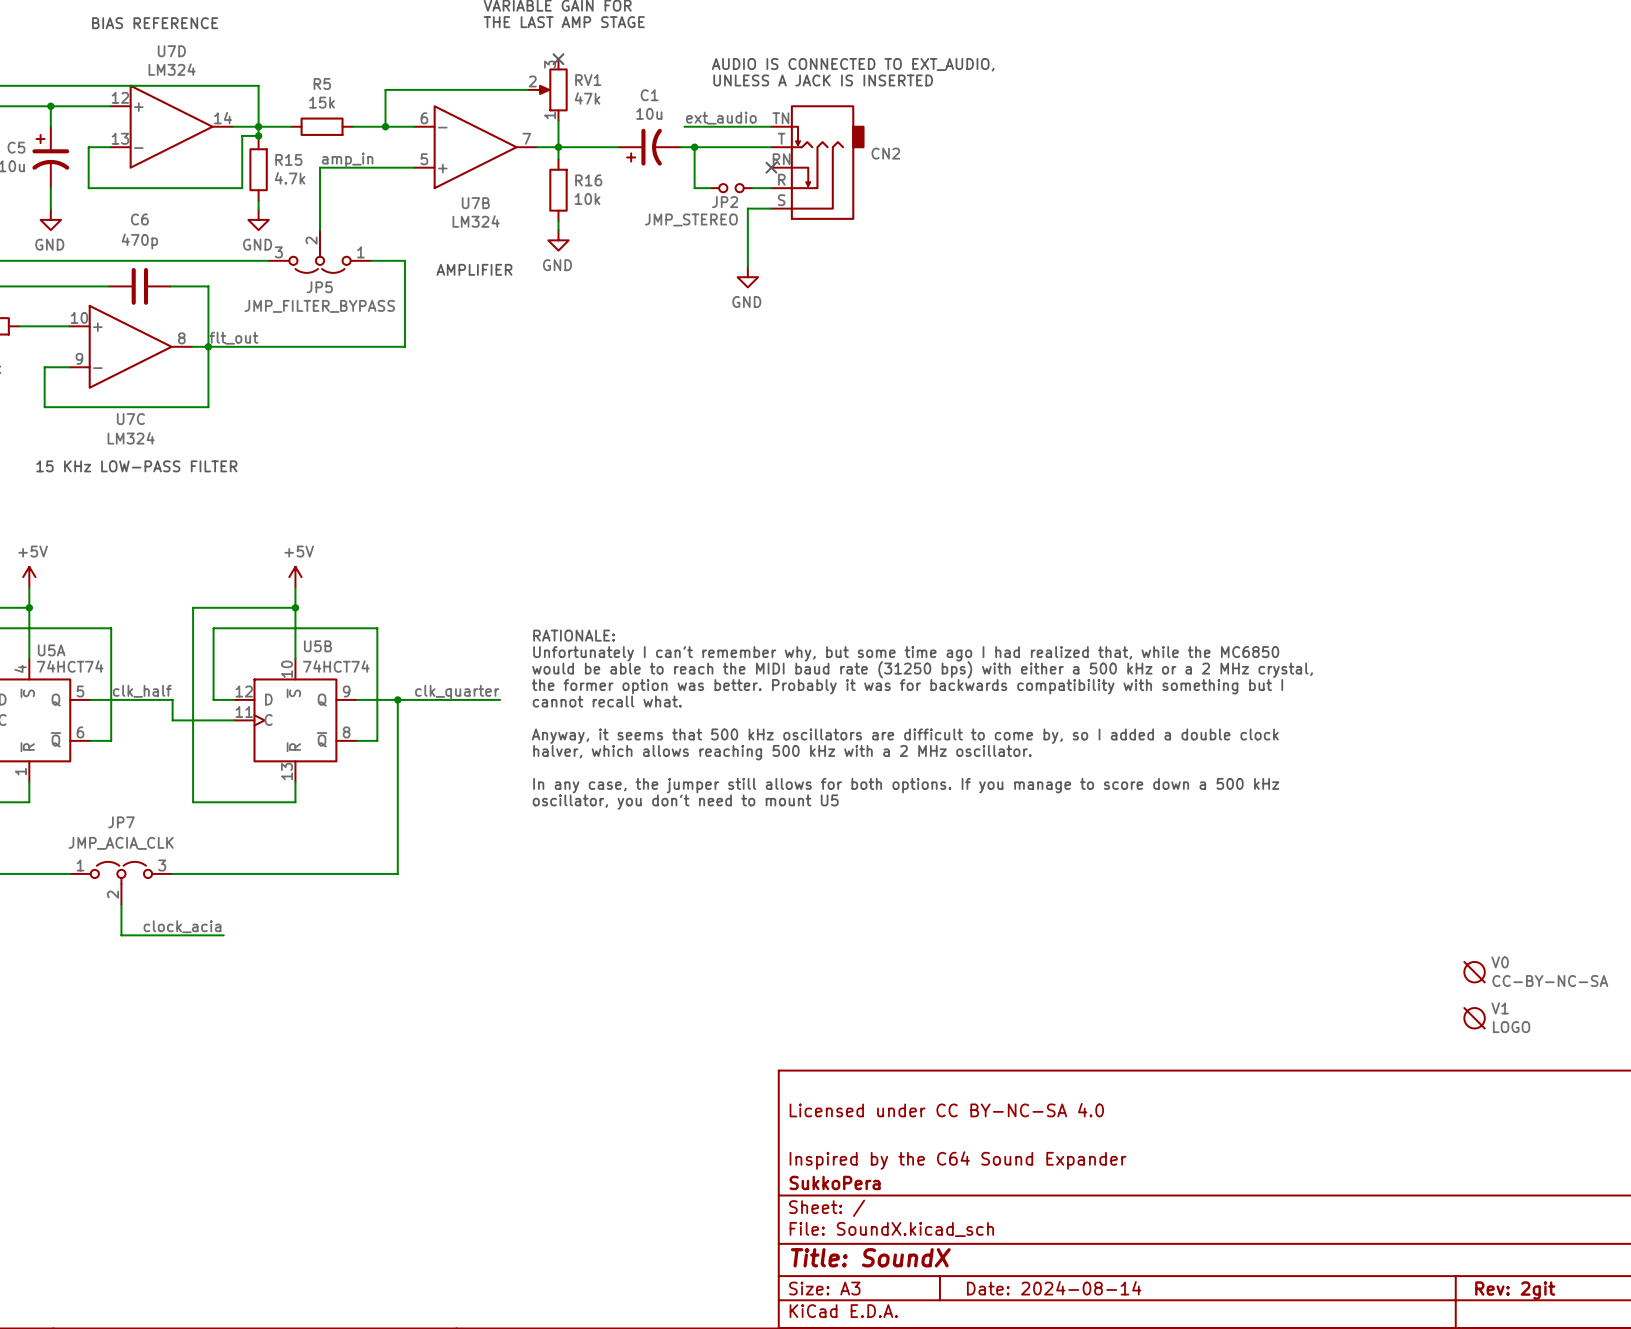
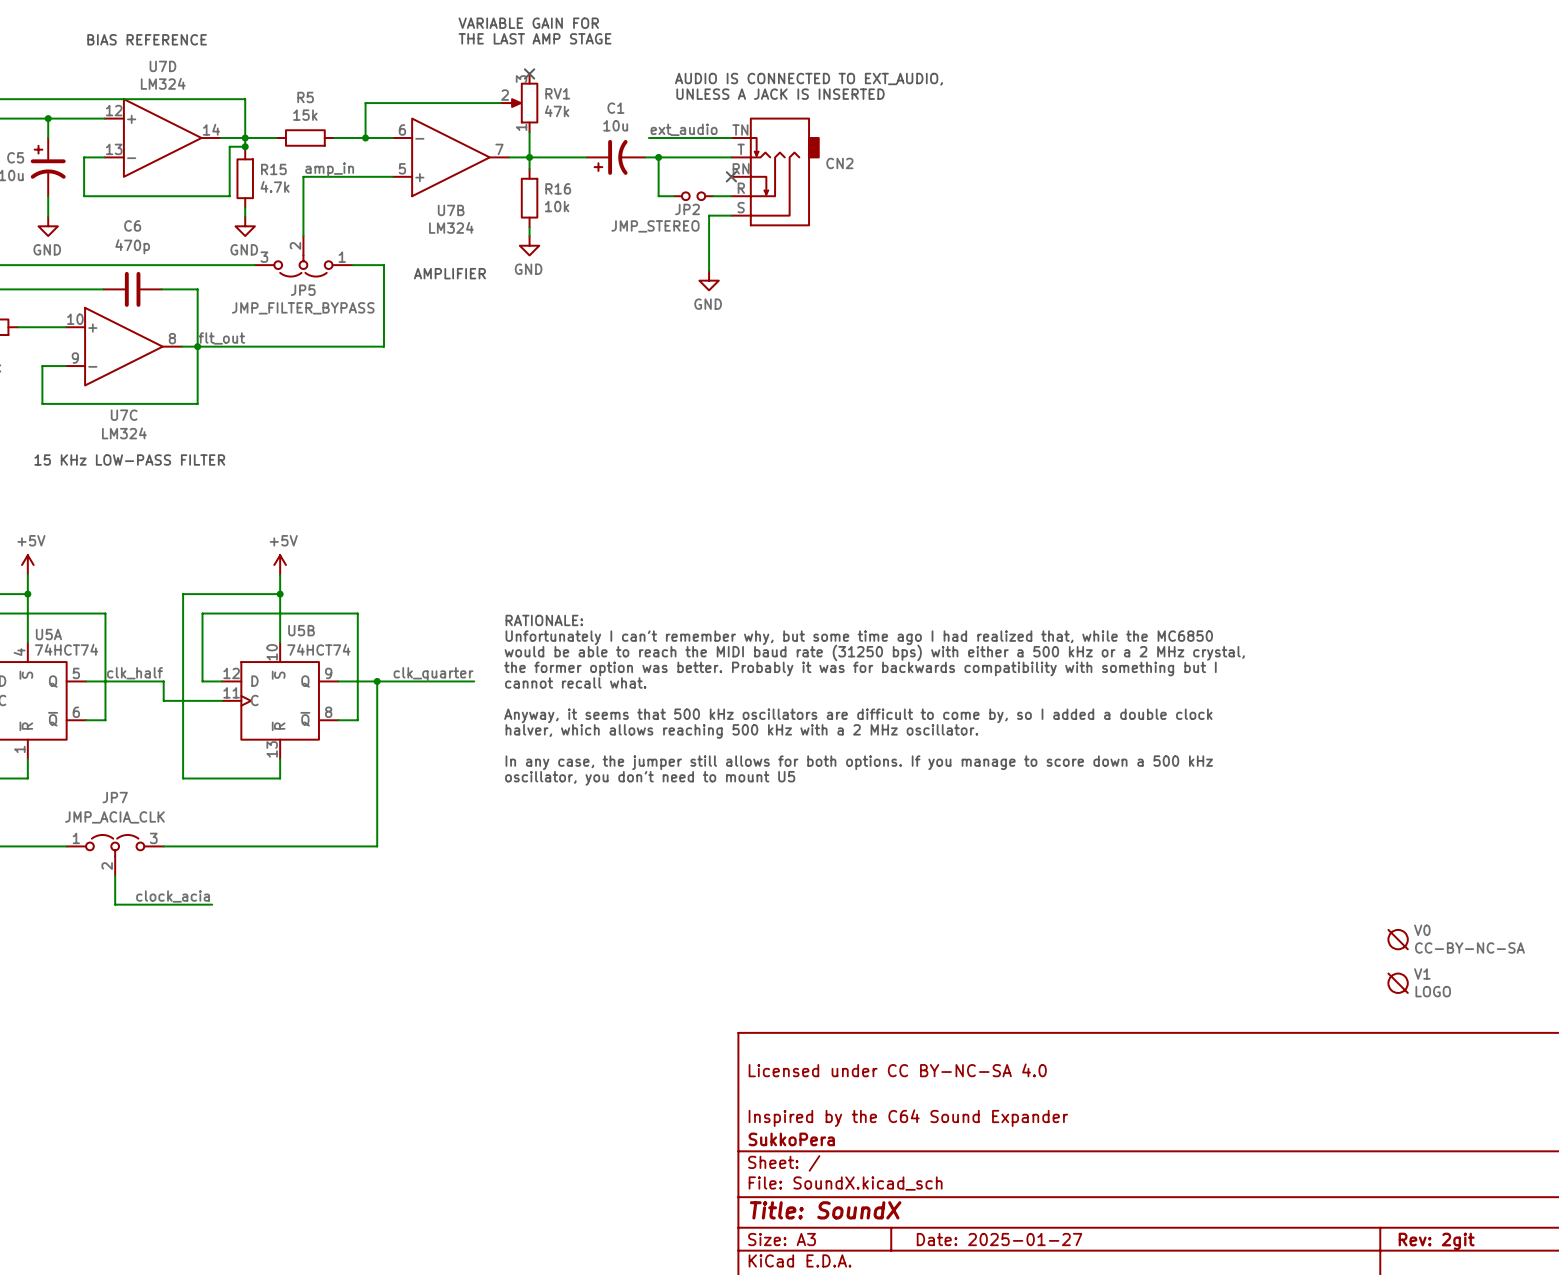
title block: Date: 2024-08-14 (1054, 1288) -> Date: 2025-01-27 (999, 1239)

